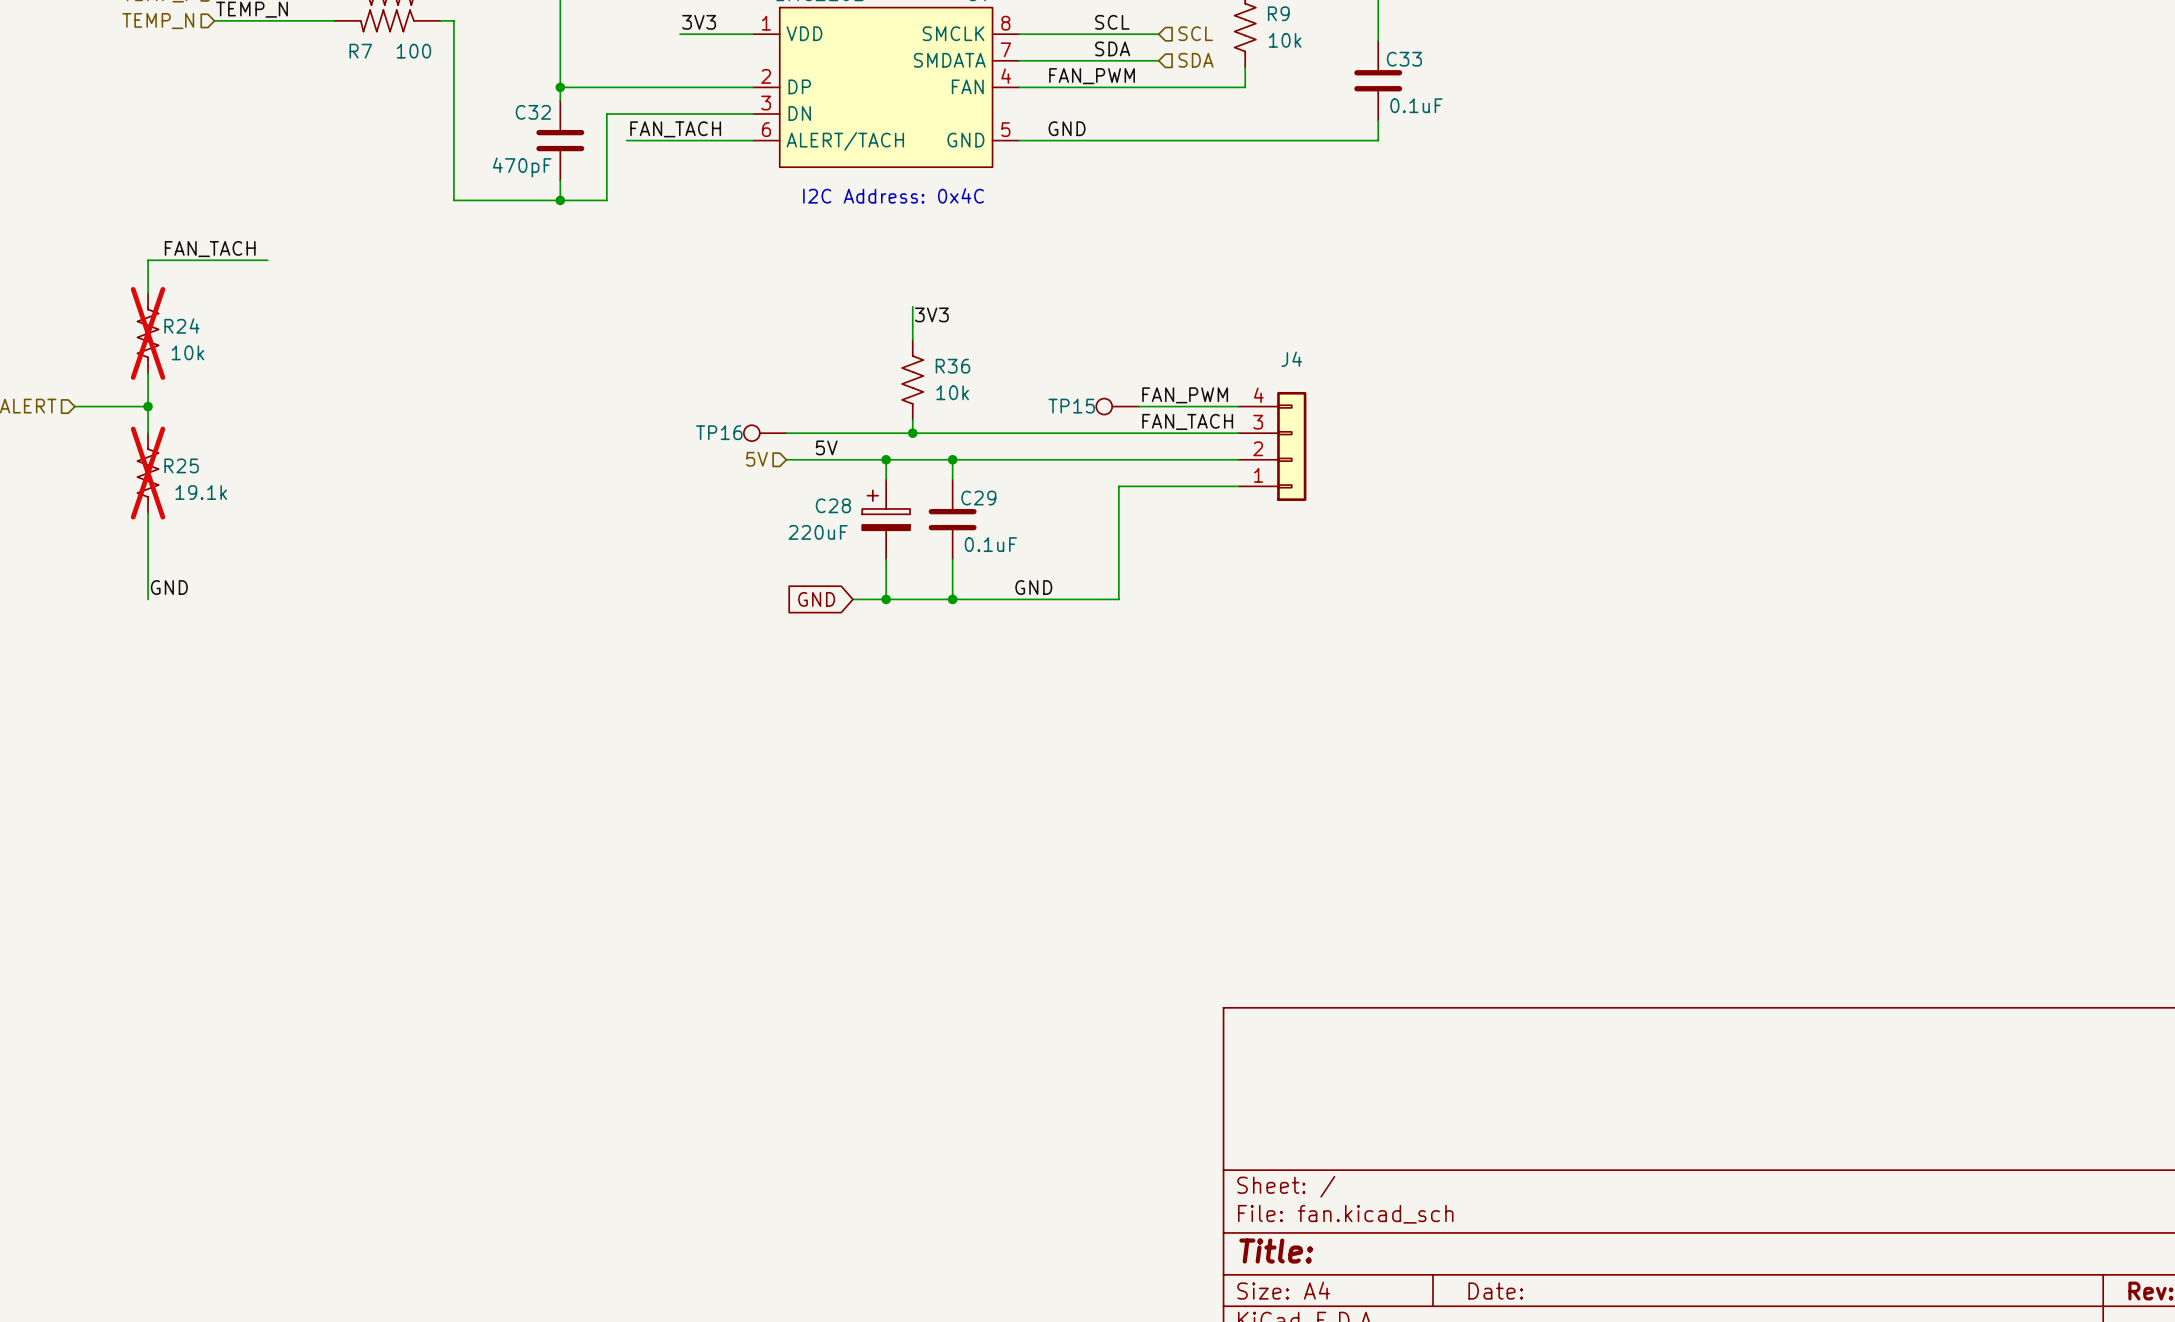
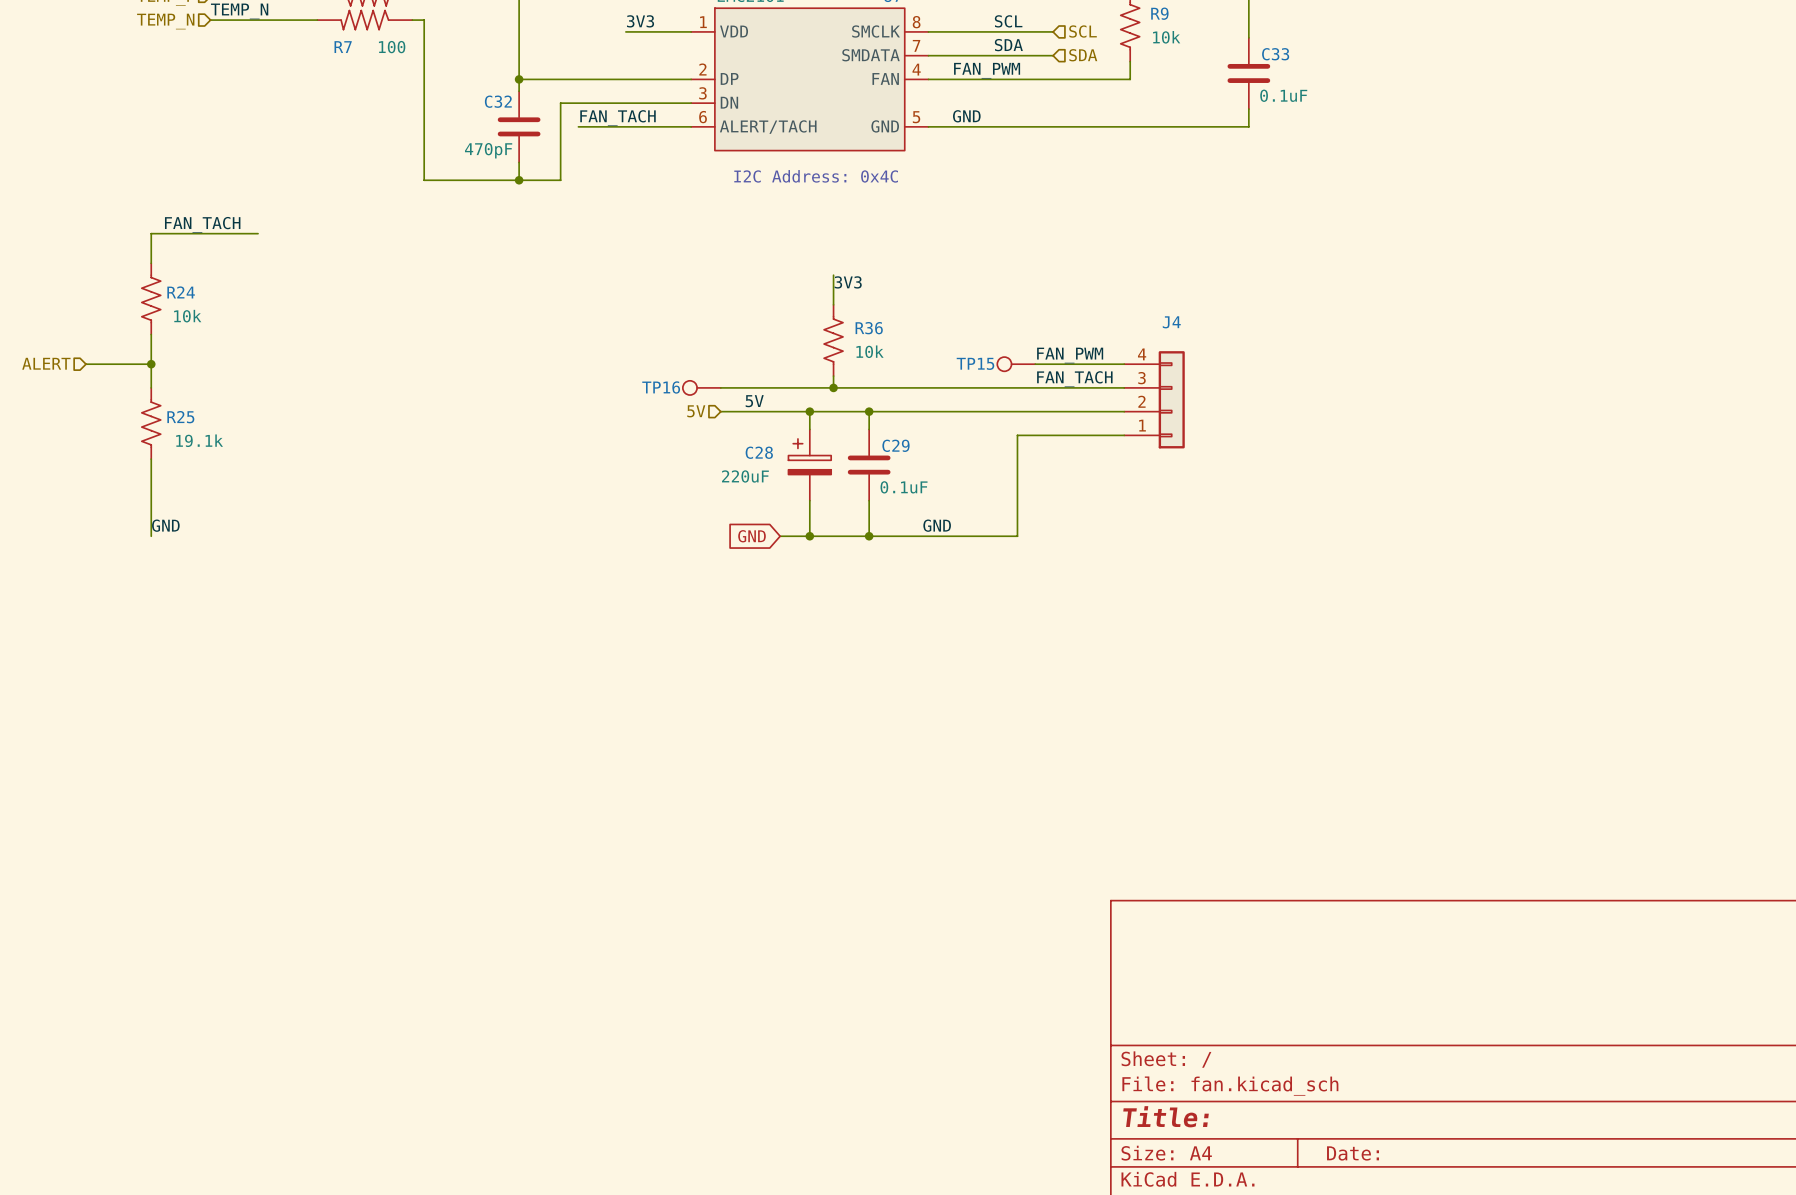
R24 do-not-place cross: (148, 333) -> none
R25 do-not-place cross: (148, 473) -> none

